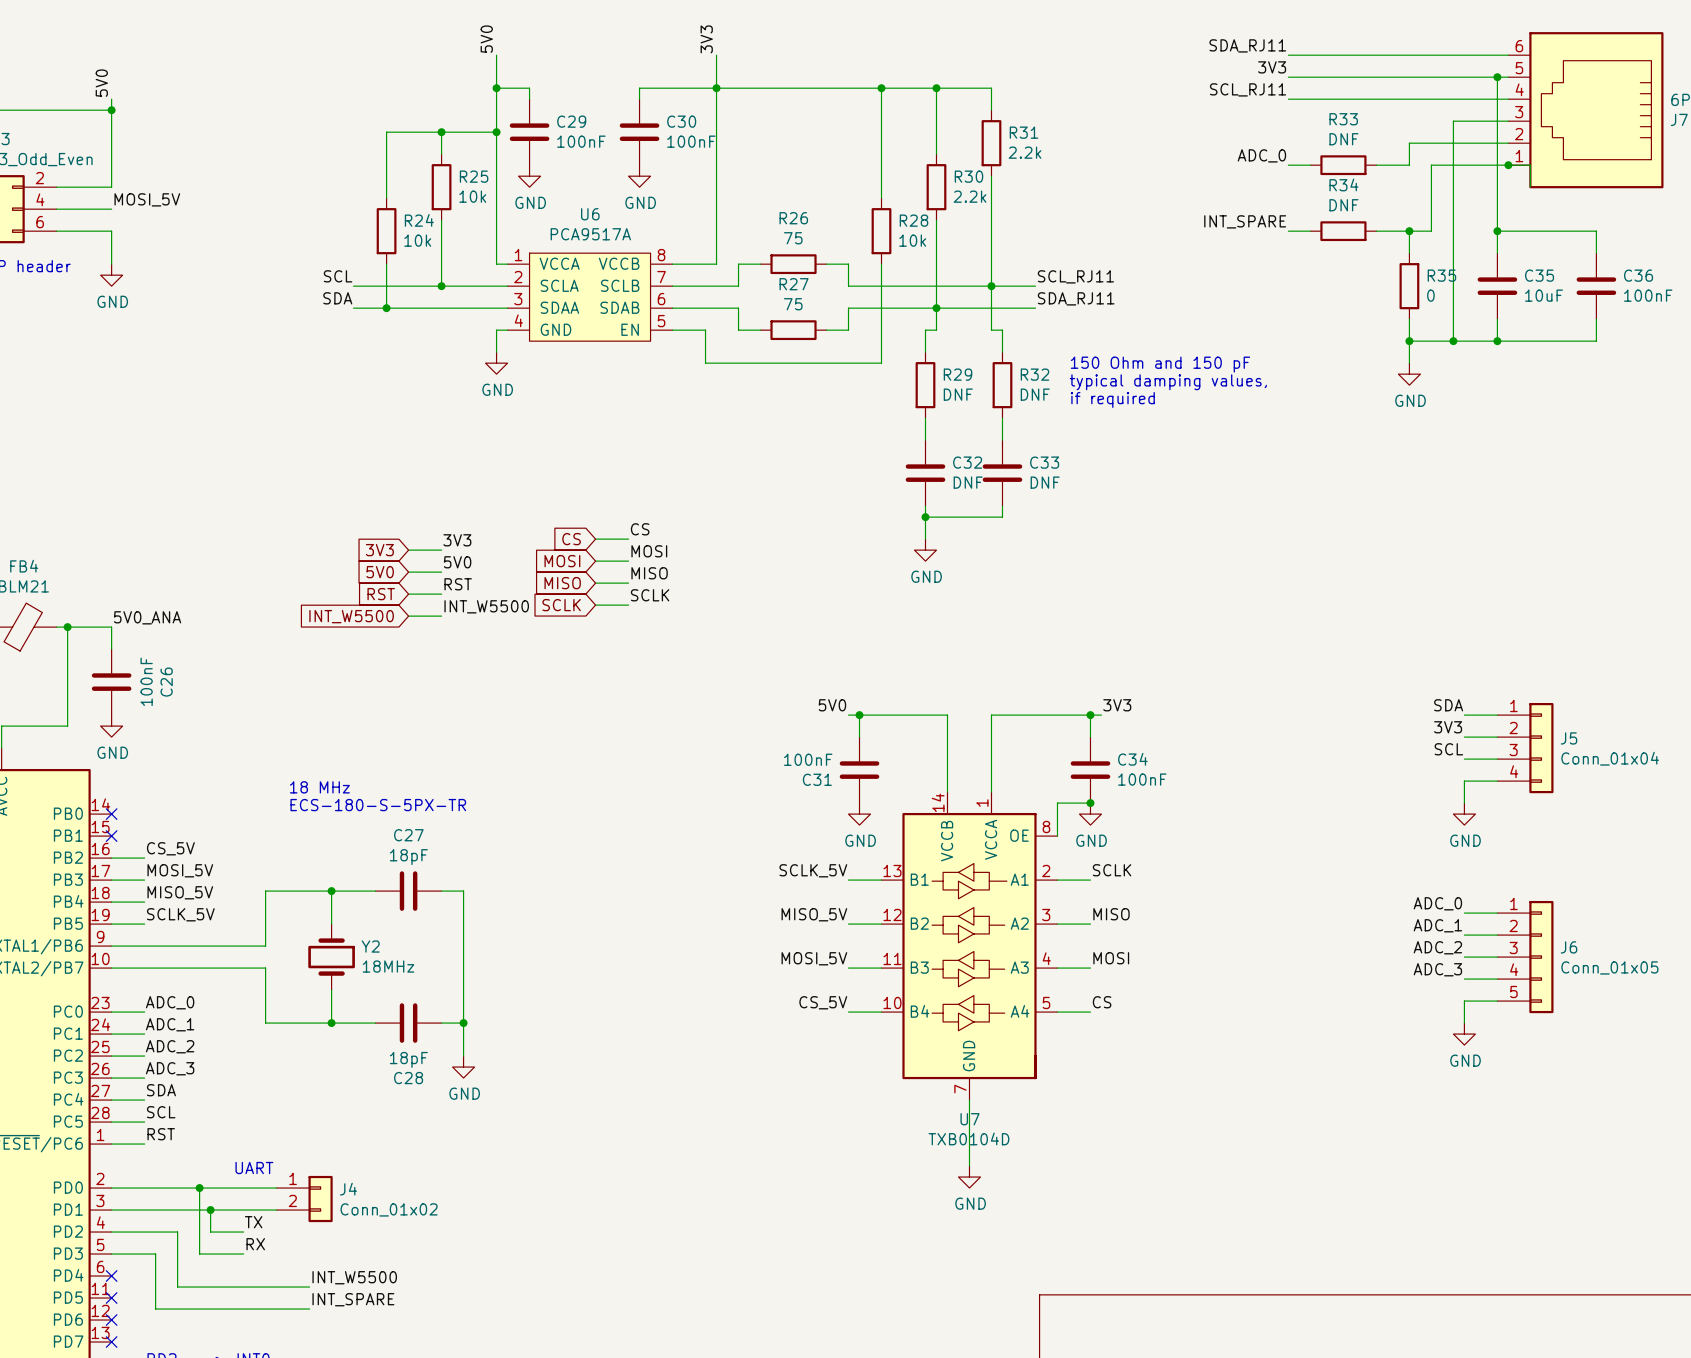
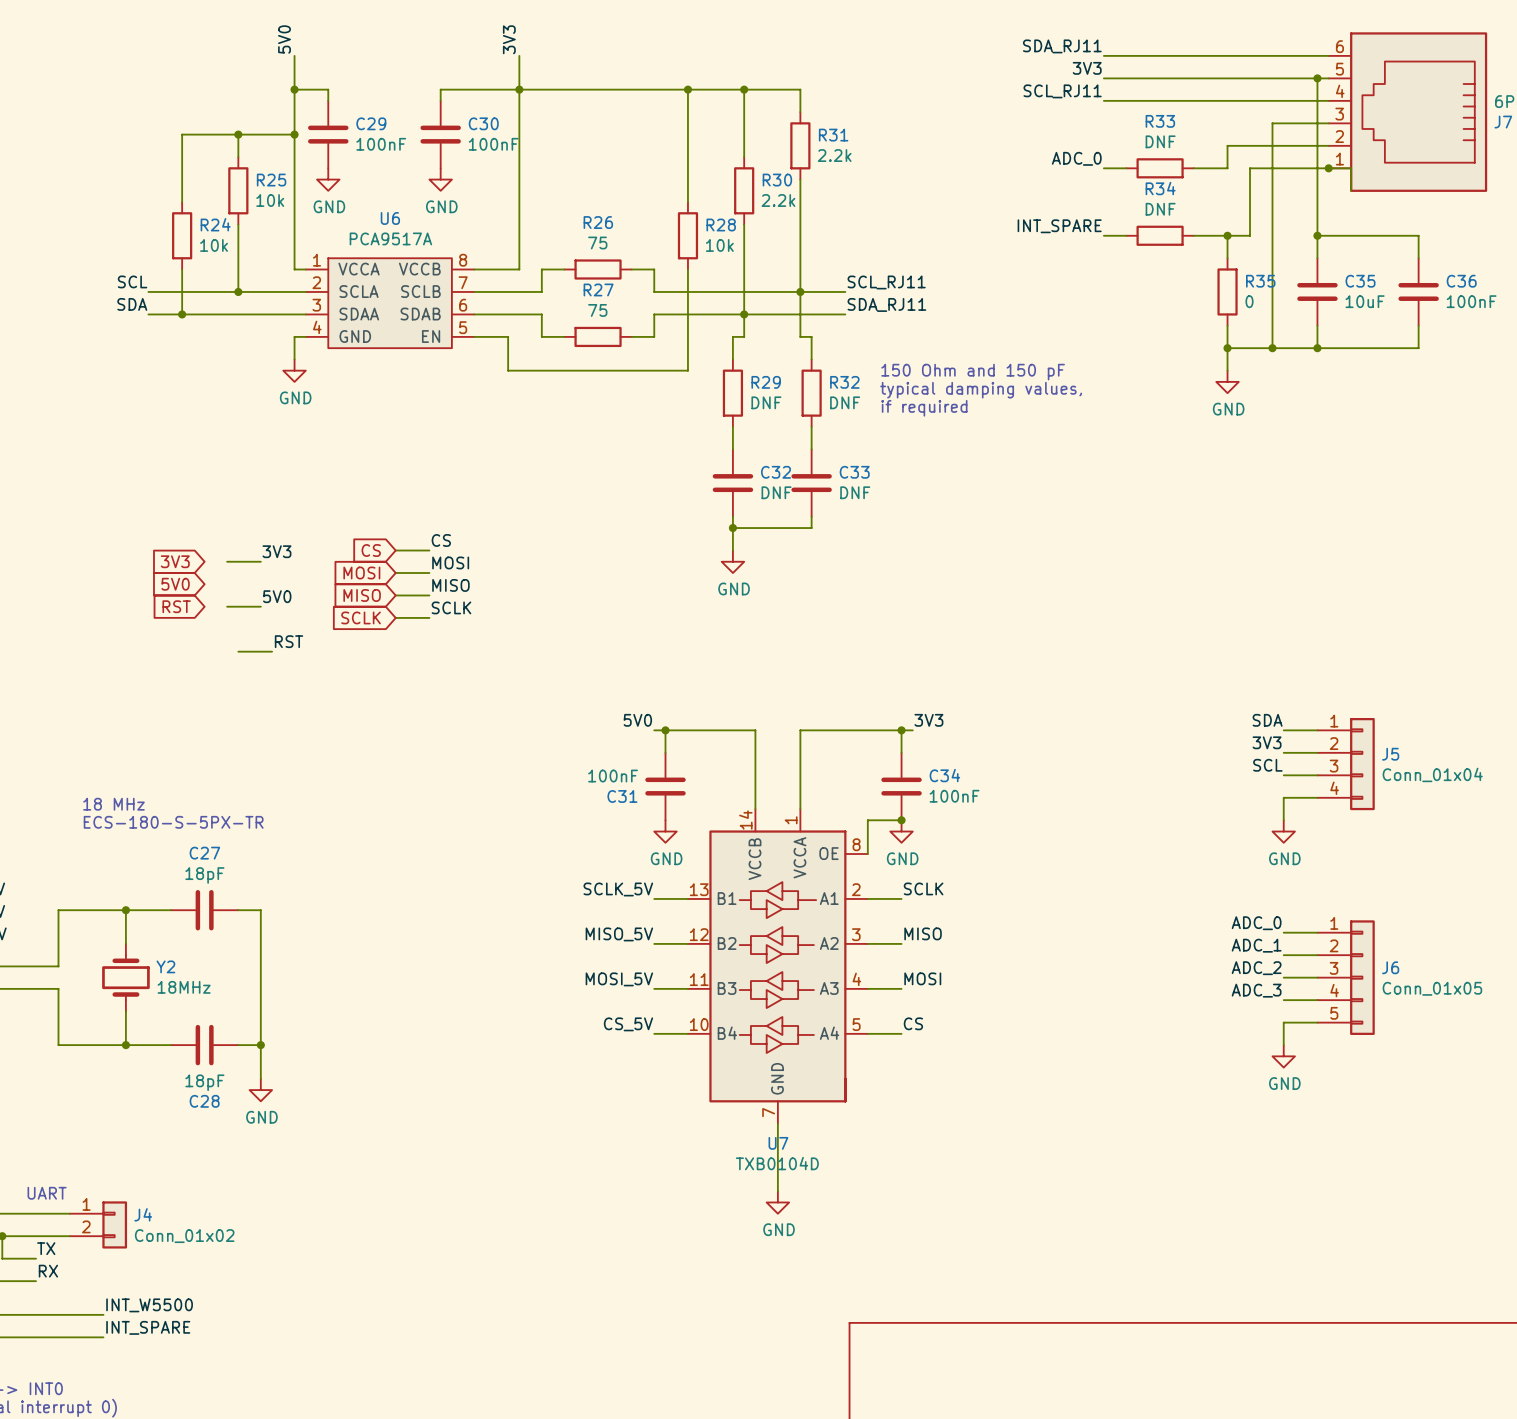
label position: 3V3 (457, 540) -> 3V3 (276, 551)
wire: (408, 550) (430, 550) -> (238, 561) (260, 561)
label position: 5V0 (457, 562) -> 5V0 (277, 596)
wire: (408, 572) (441, 572) -> none
label position: RST (458, 584) -> RST (289, 641)
wire: (408, 594) (430, 594) -> (238, 606) (260, 606)
label: INT_W5500 (486, 606) -> none
global label: INT_W5500 (351, 616) -> none
wire: (408, 616) (441, 616) -> (238, 651) (272, 651)

